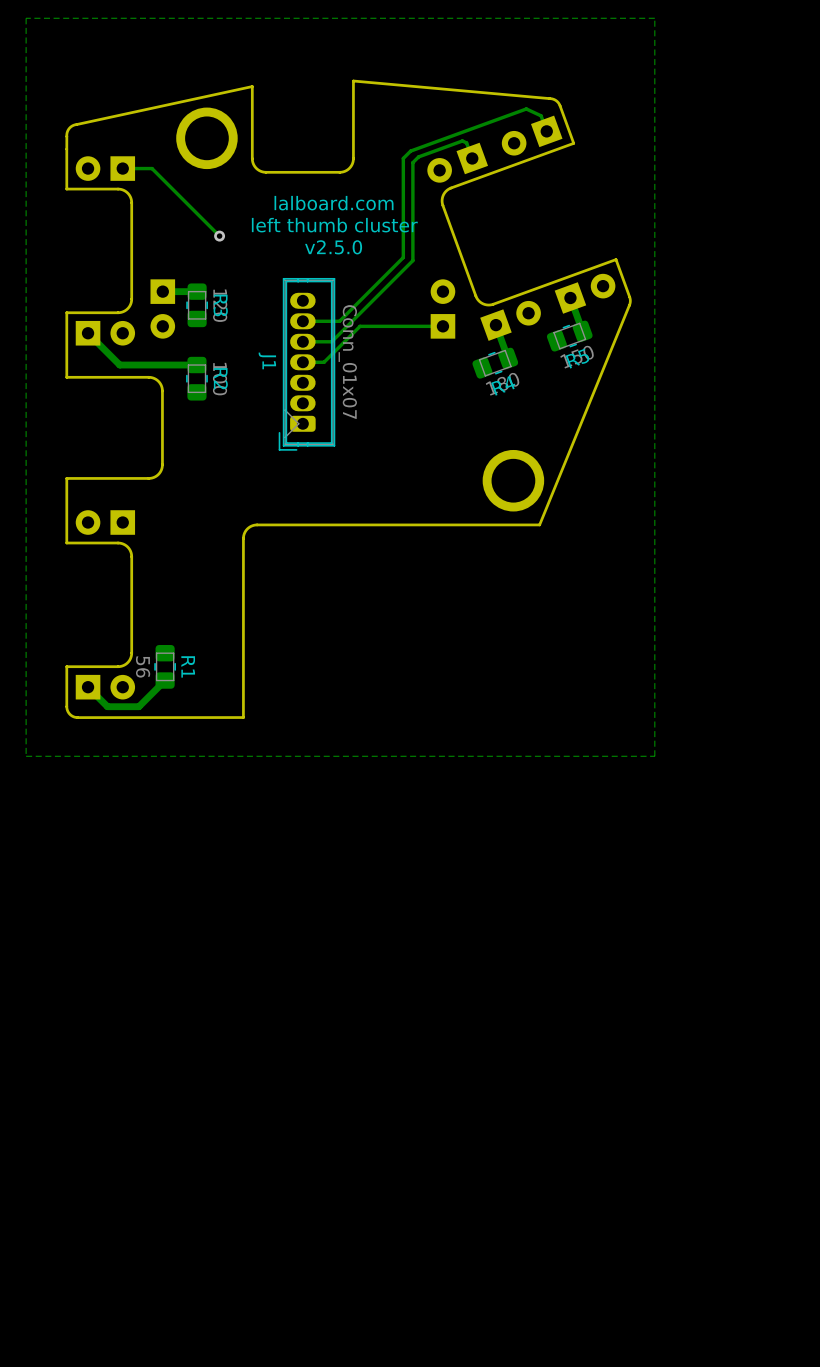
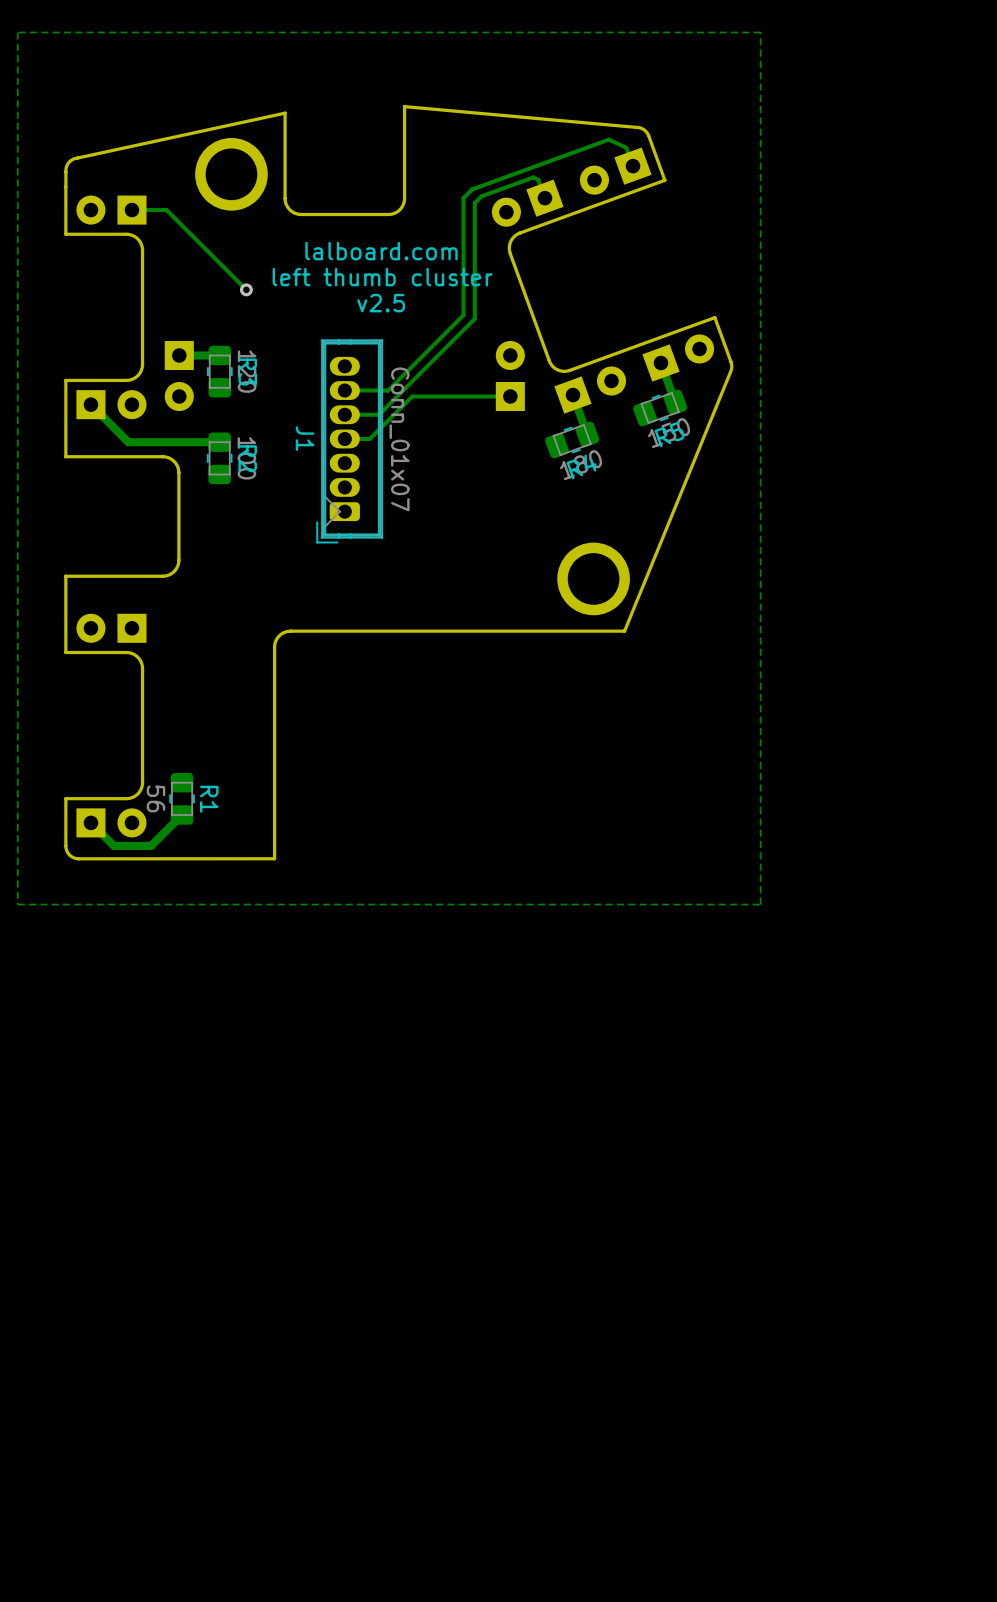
text: v2.5.0 (333, 247) -> v2.5 (381, 303)

